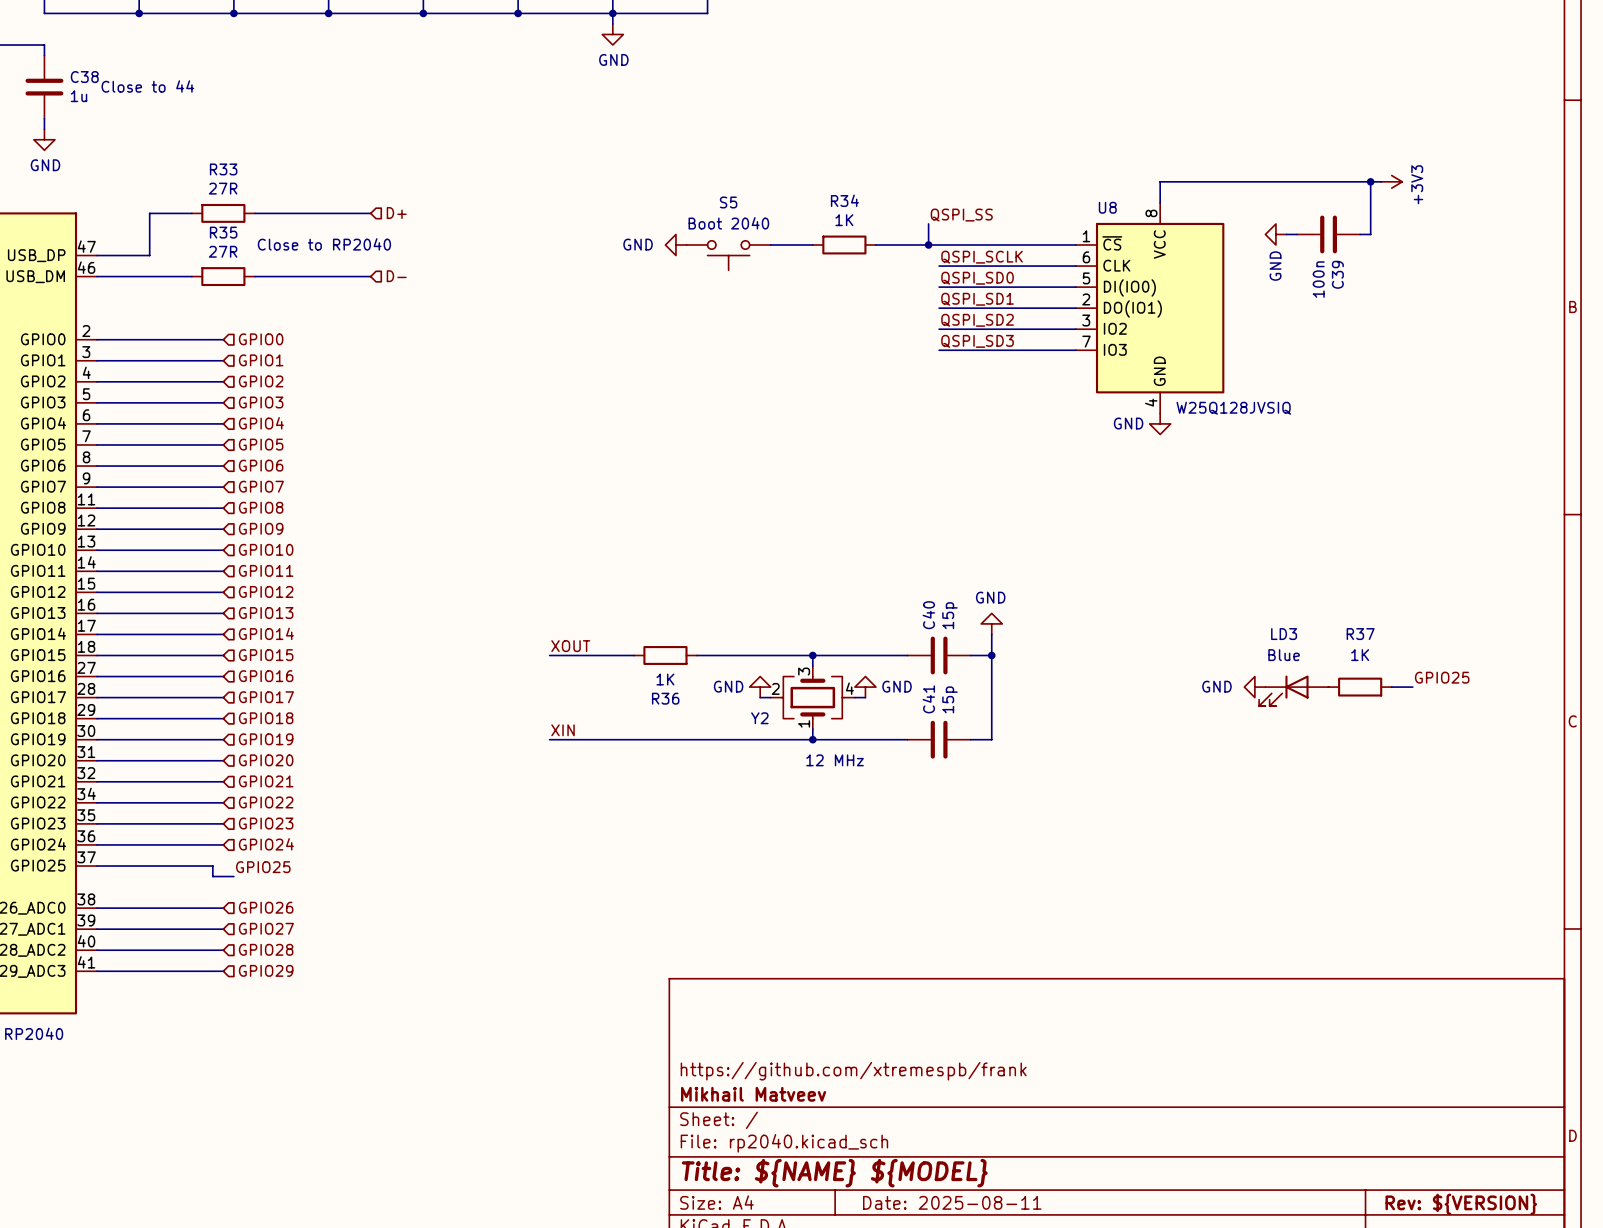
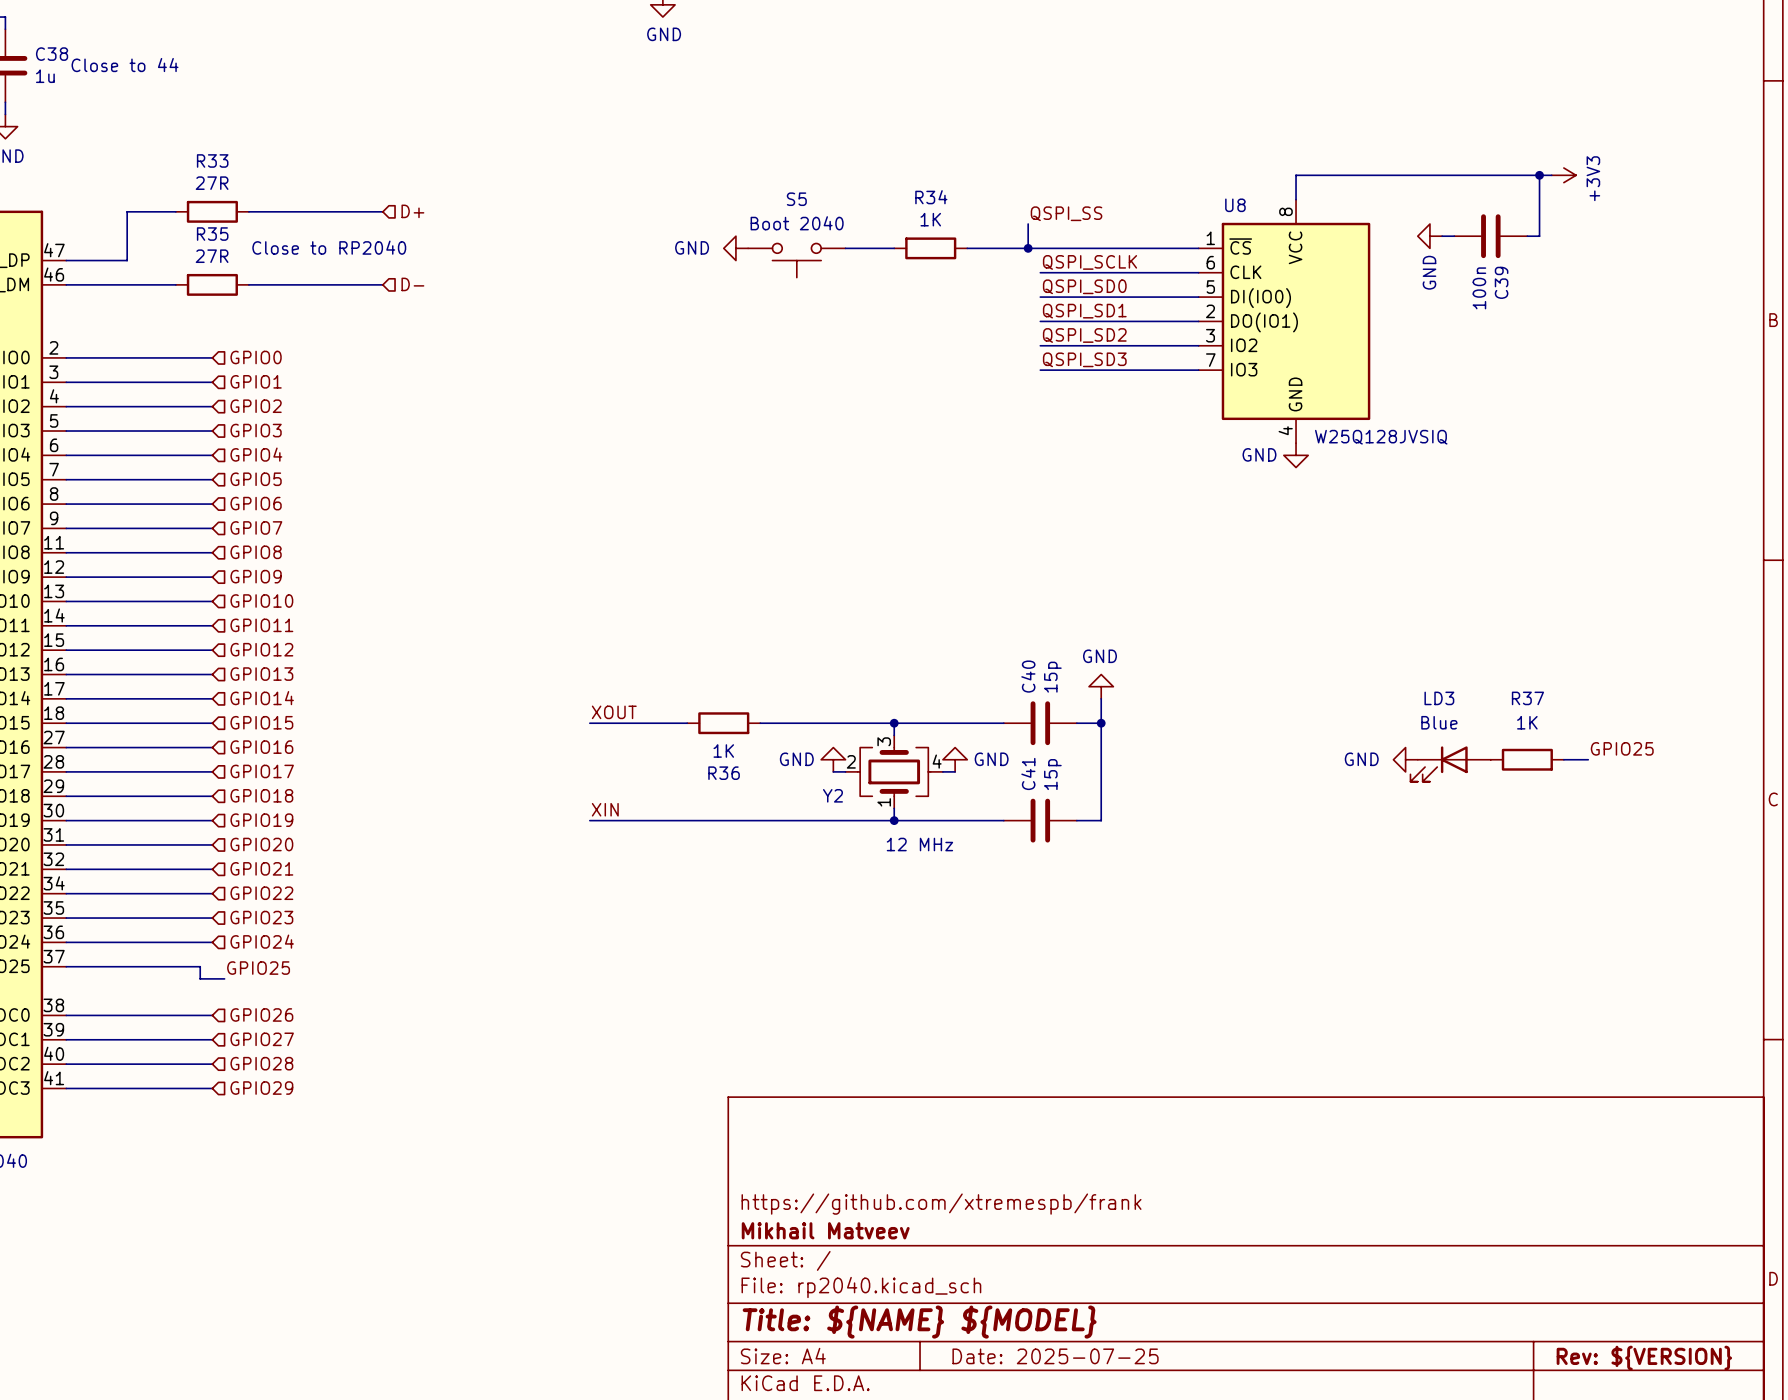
title block: Date: 2025-08-11 (952, 1202) -> Date: 2025-07-25 (1055, 1356)

